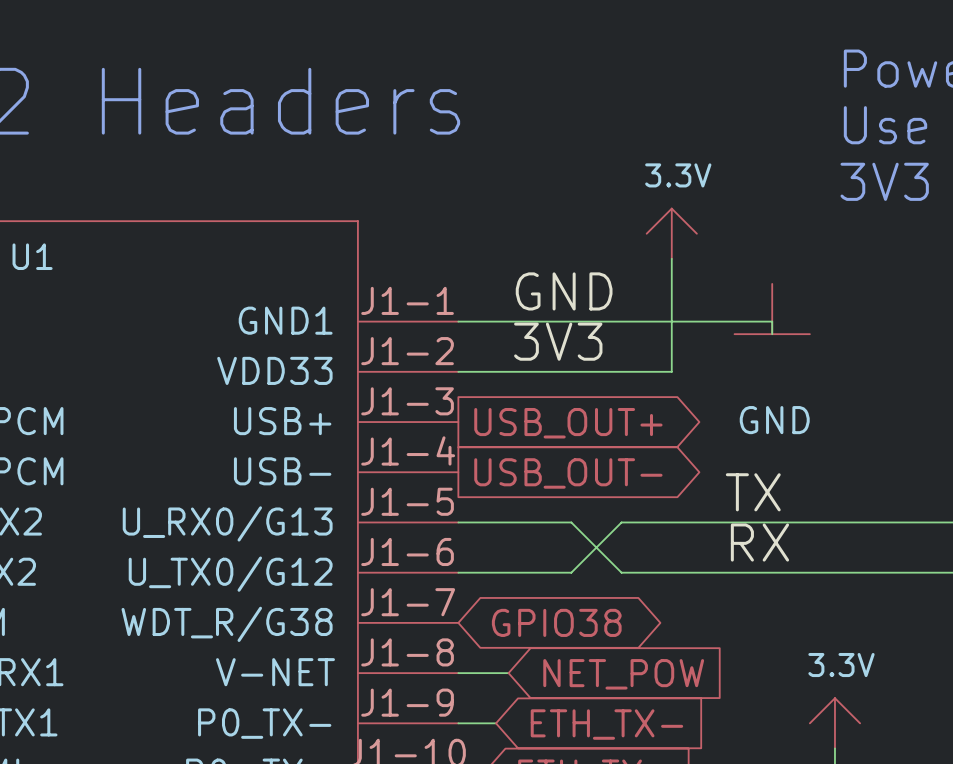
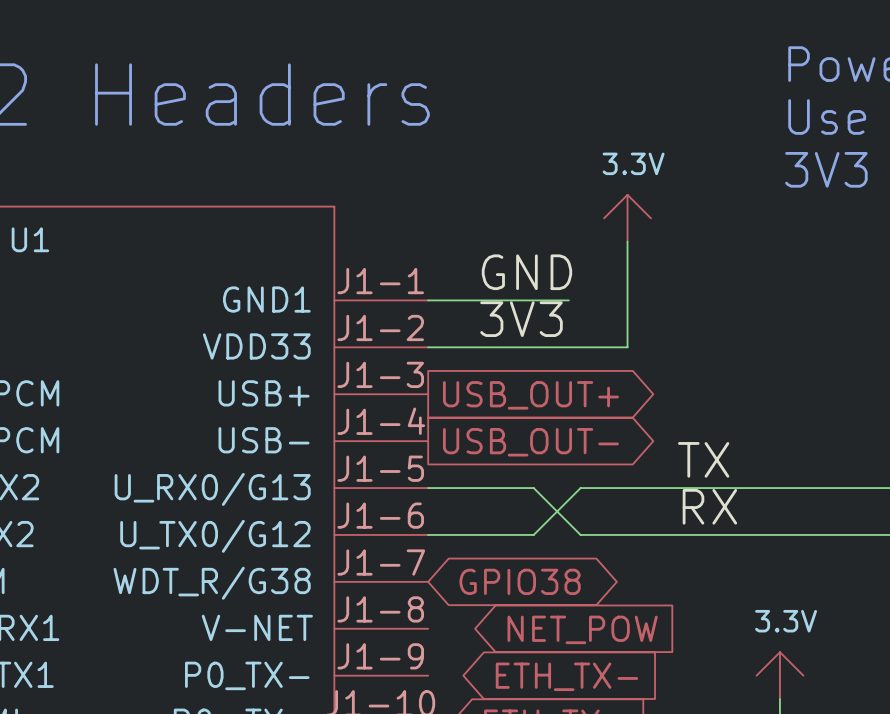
power symbol: GND (772, 309) -> none
wire: (609, 321) (772, 321) (772, 334) -> none
wire: (458, 673) (508, 673) -> none
wire: (458, 723) (496, 723) -> none

